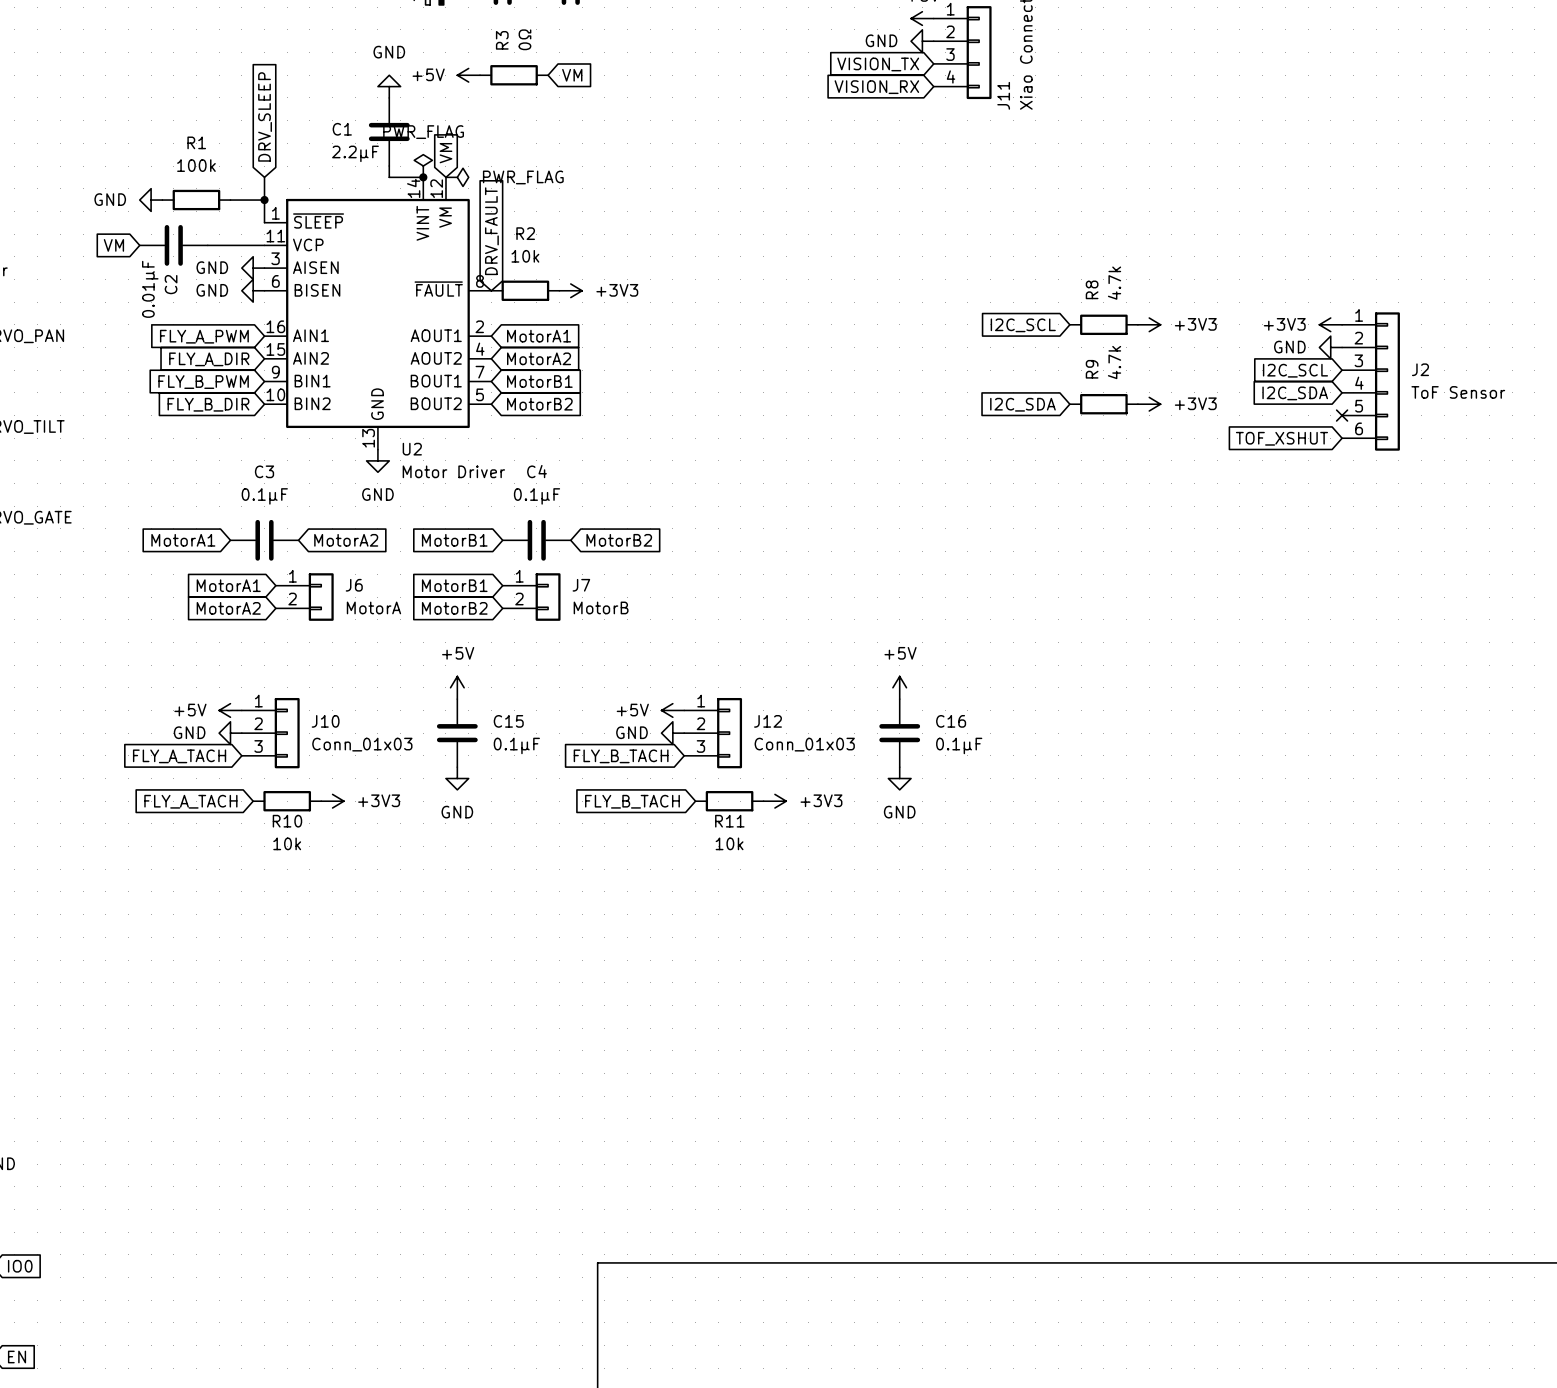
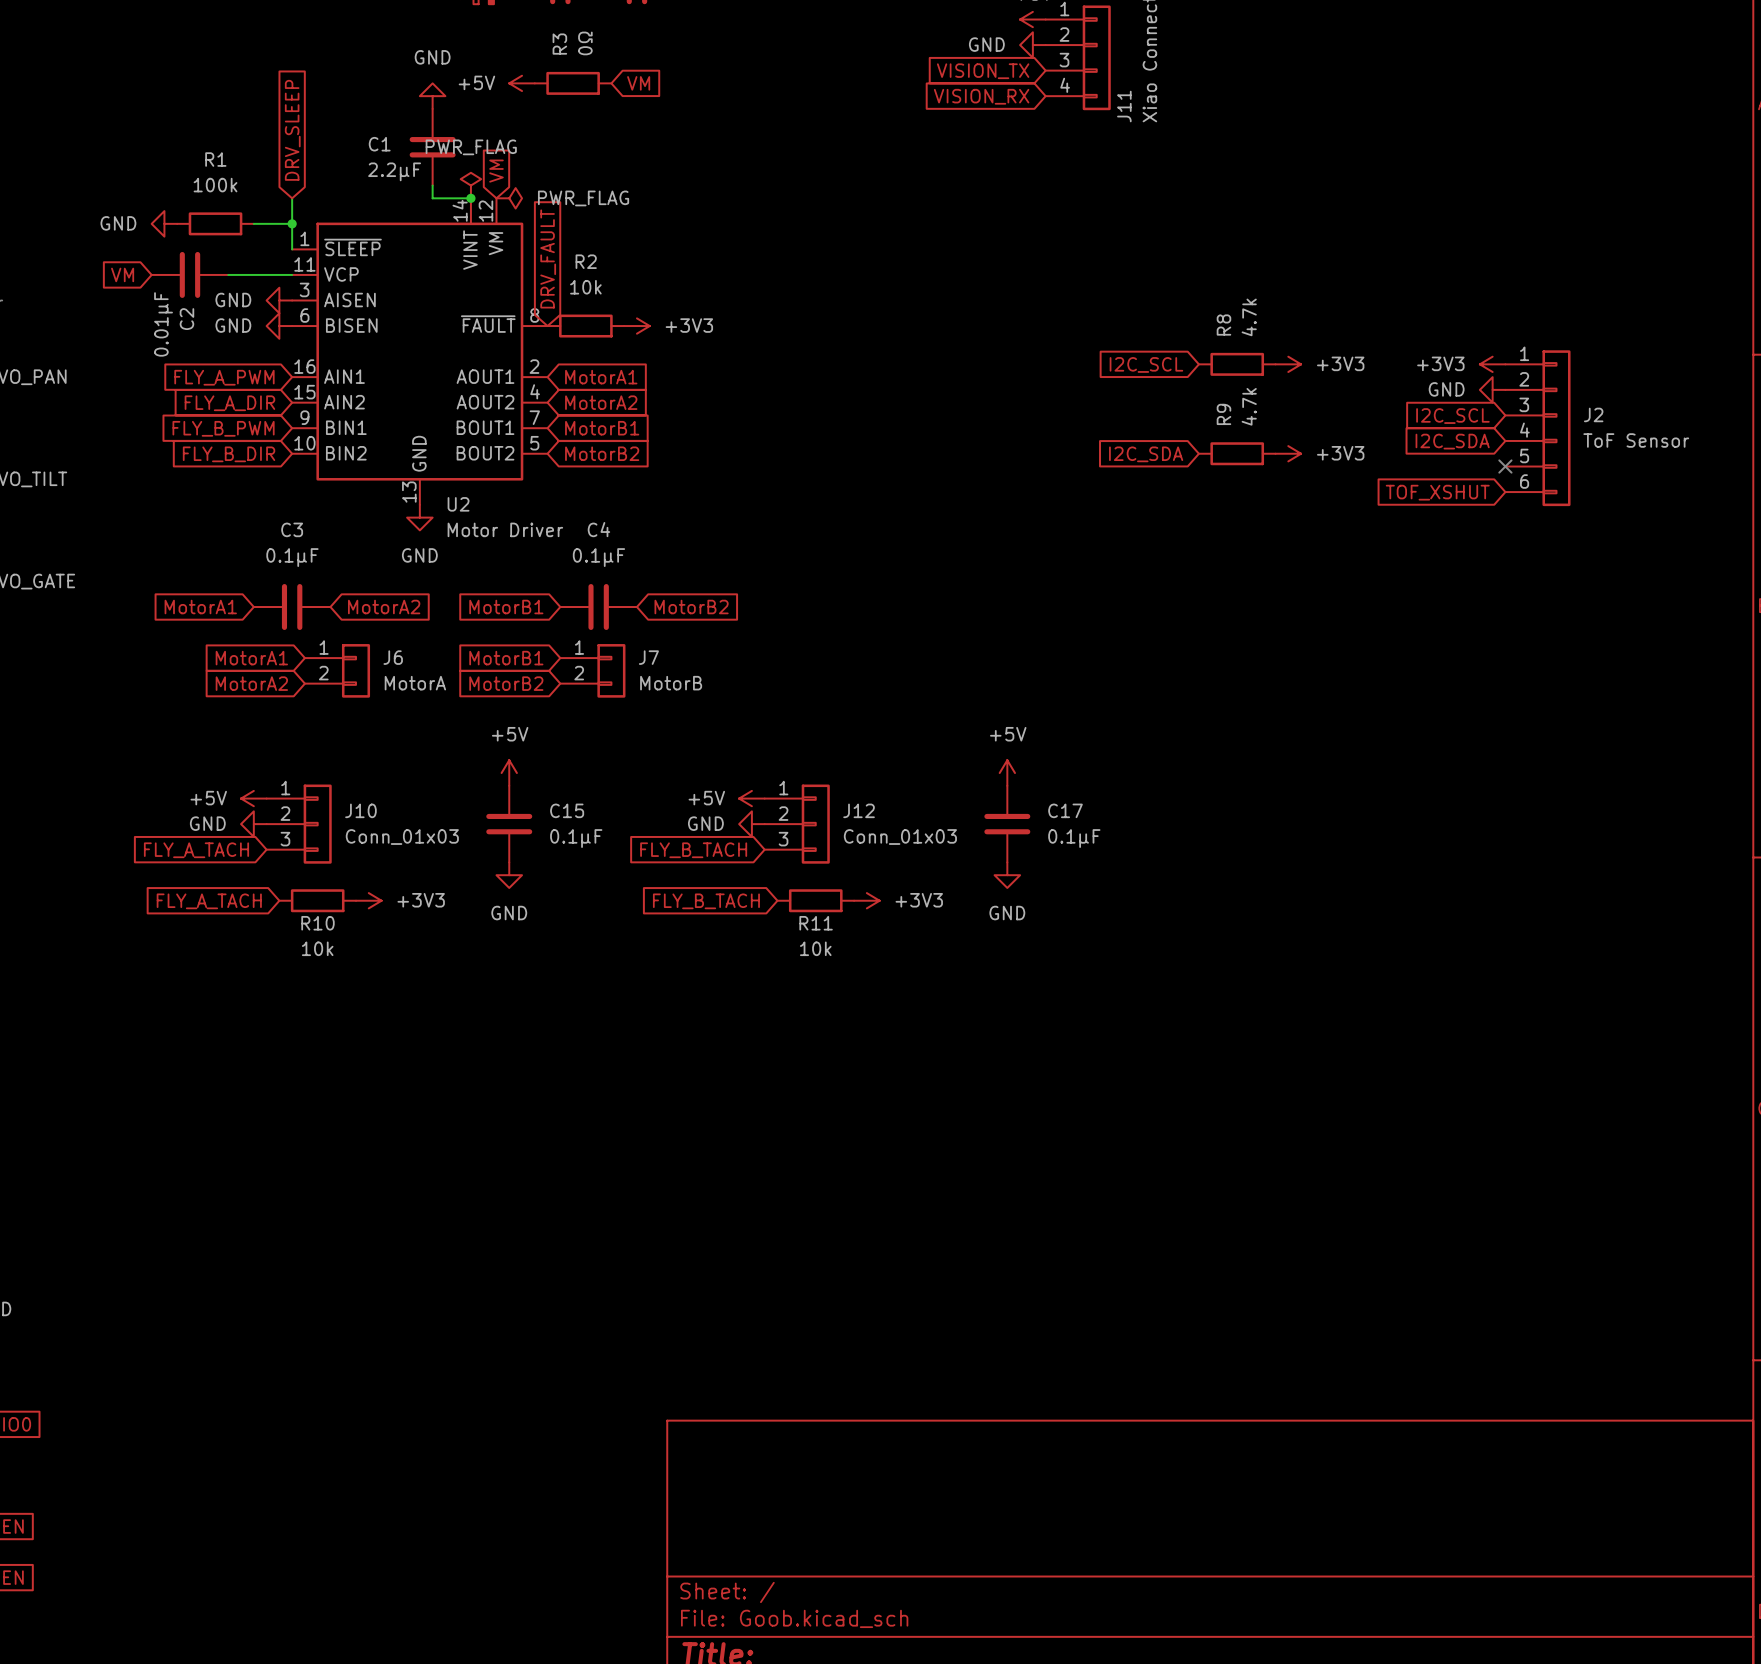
C16 name: C16 (951, 721) -> C17 (1065, 810)

